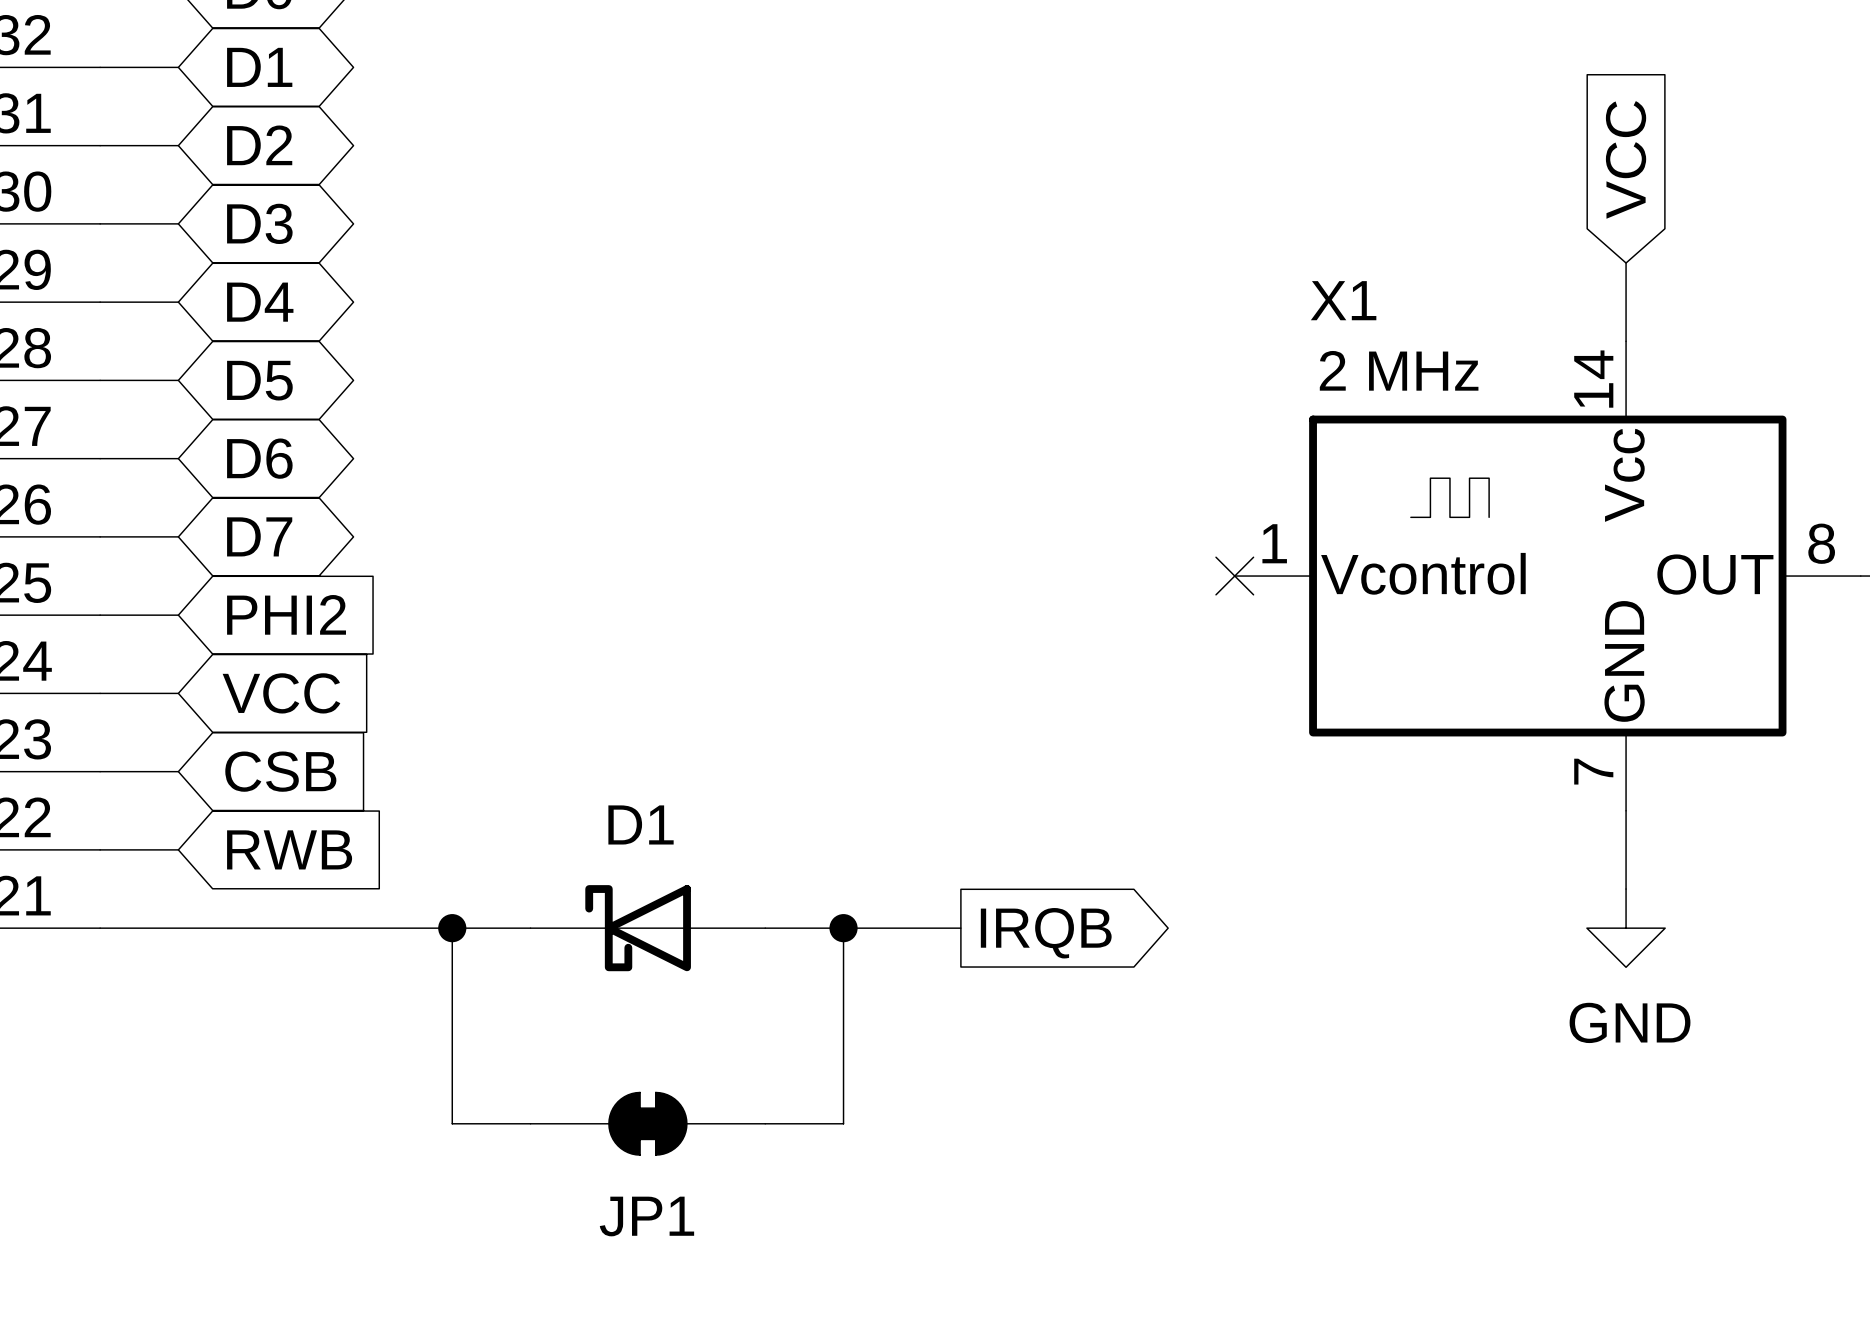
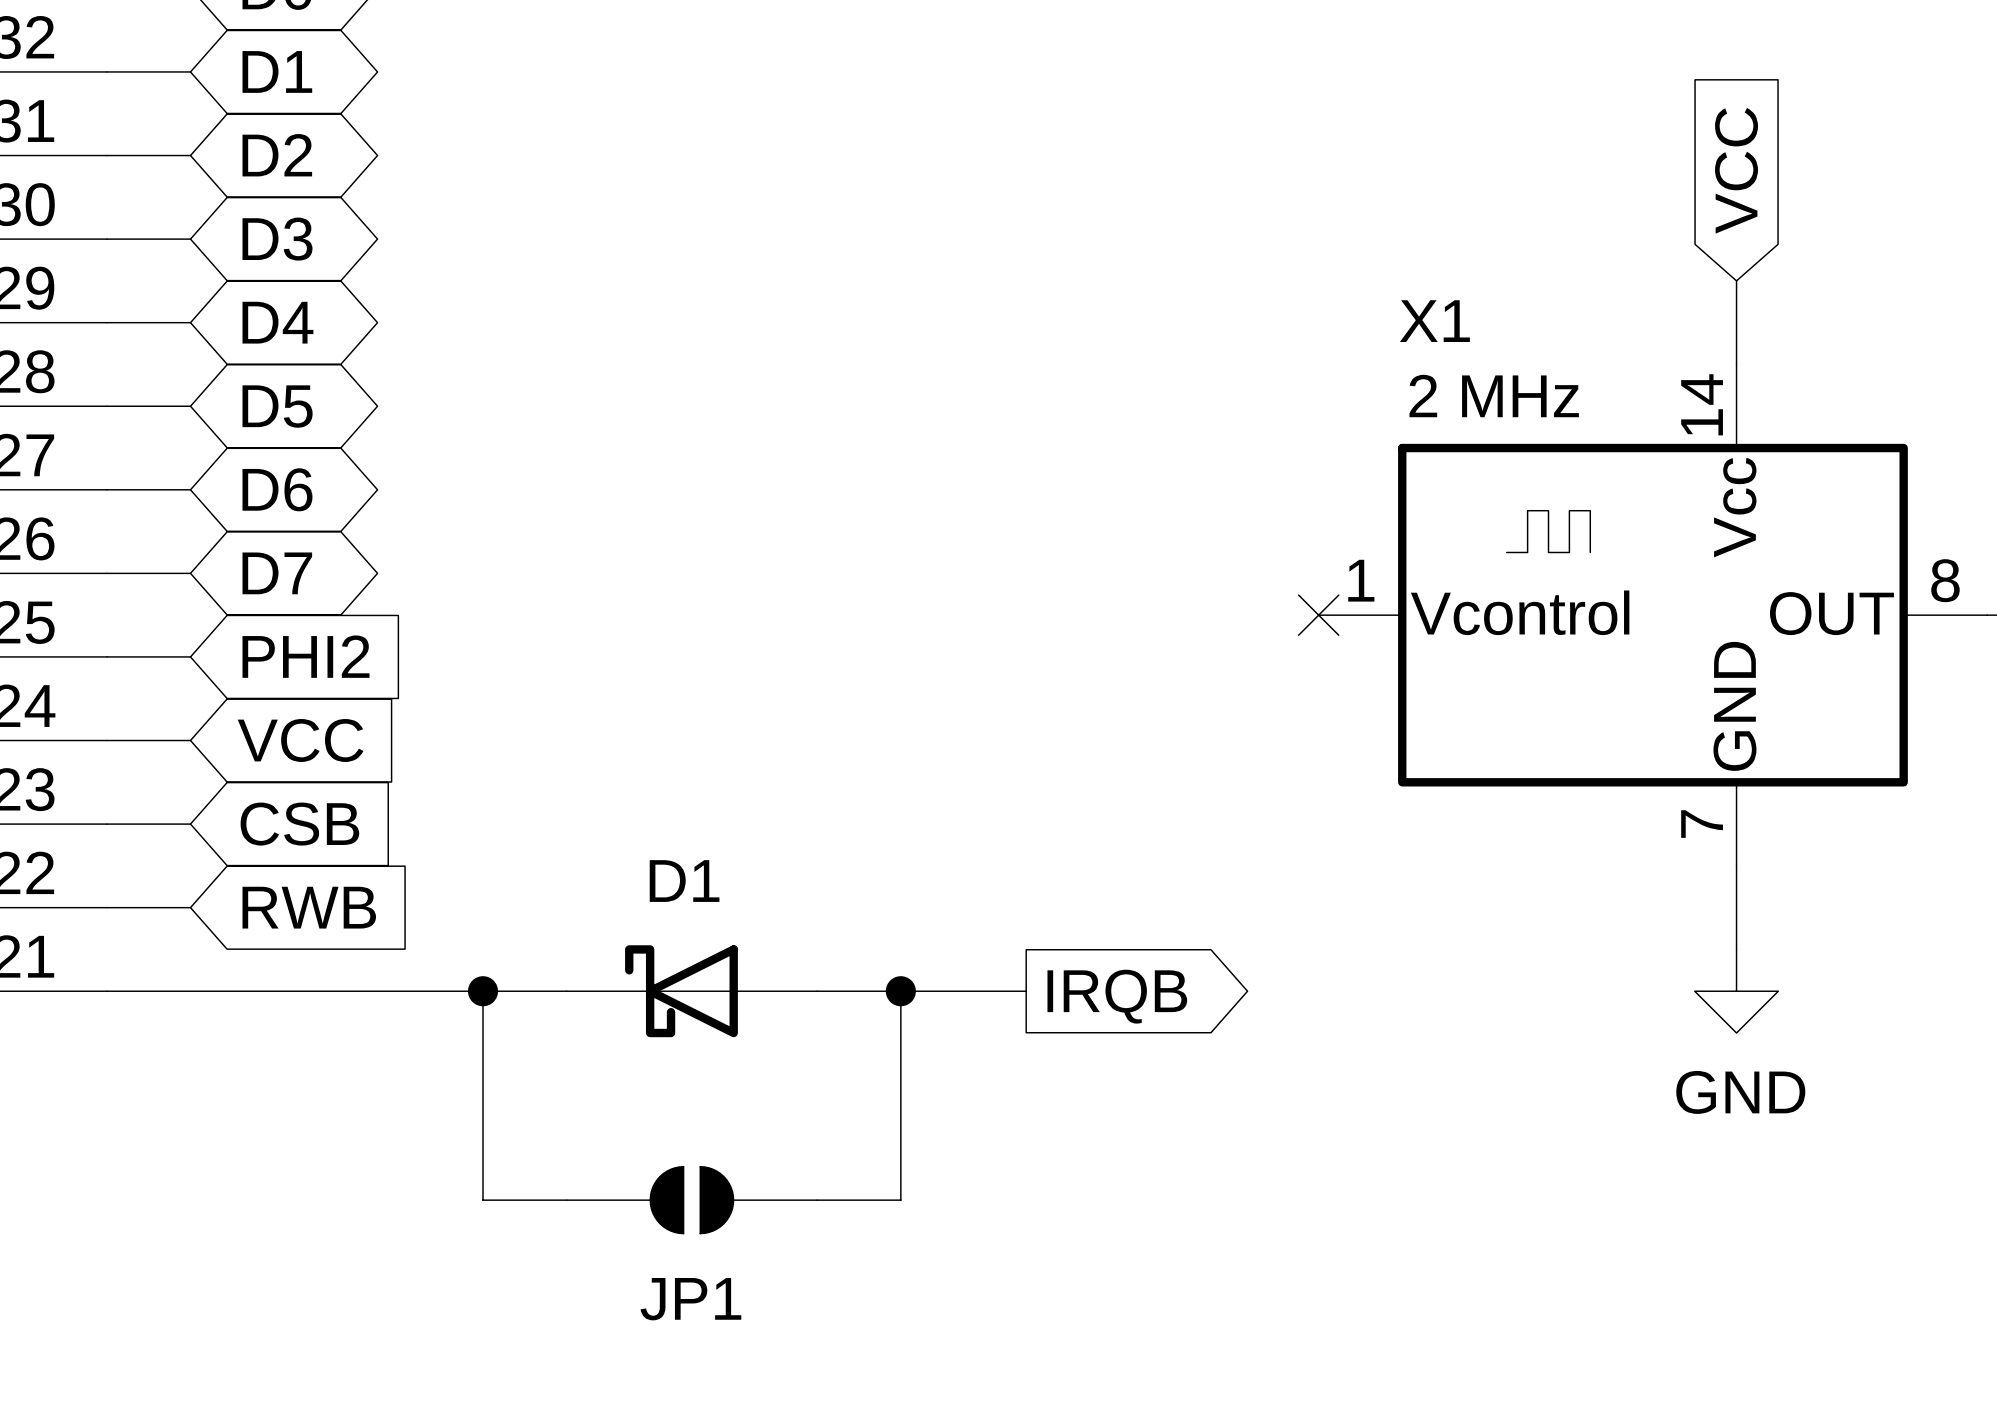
JP1 symbol: [530, 1092, 766, 1156] -> [566, 1166, 818, 1234]

